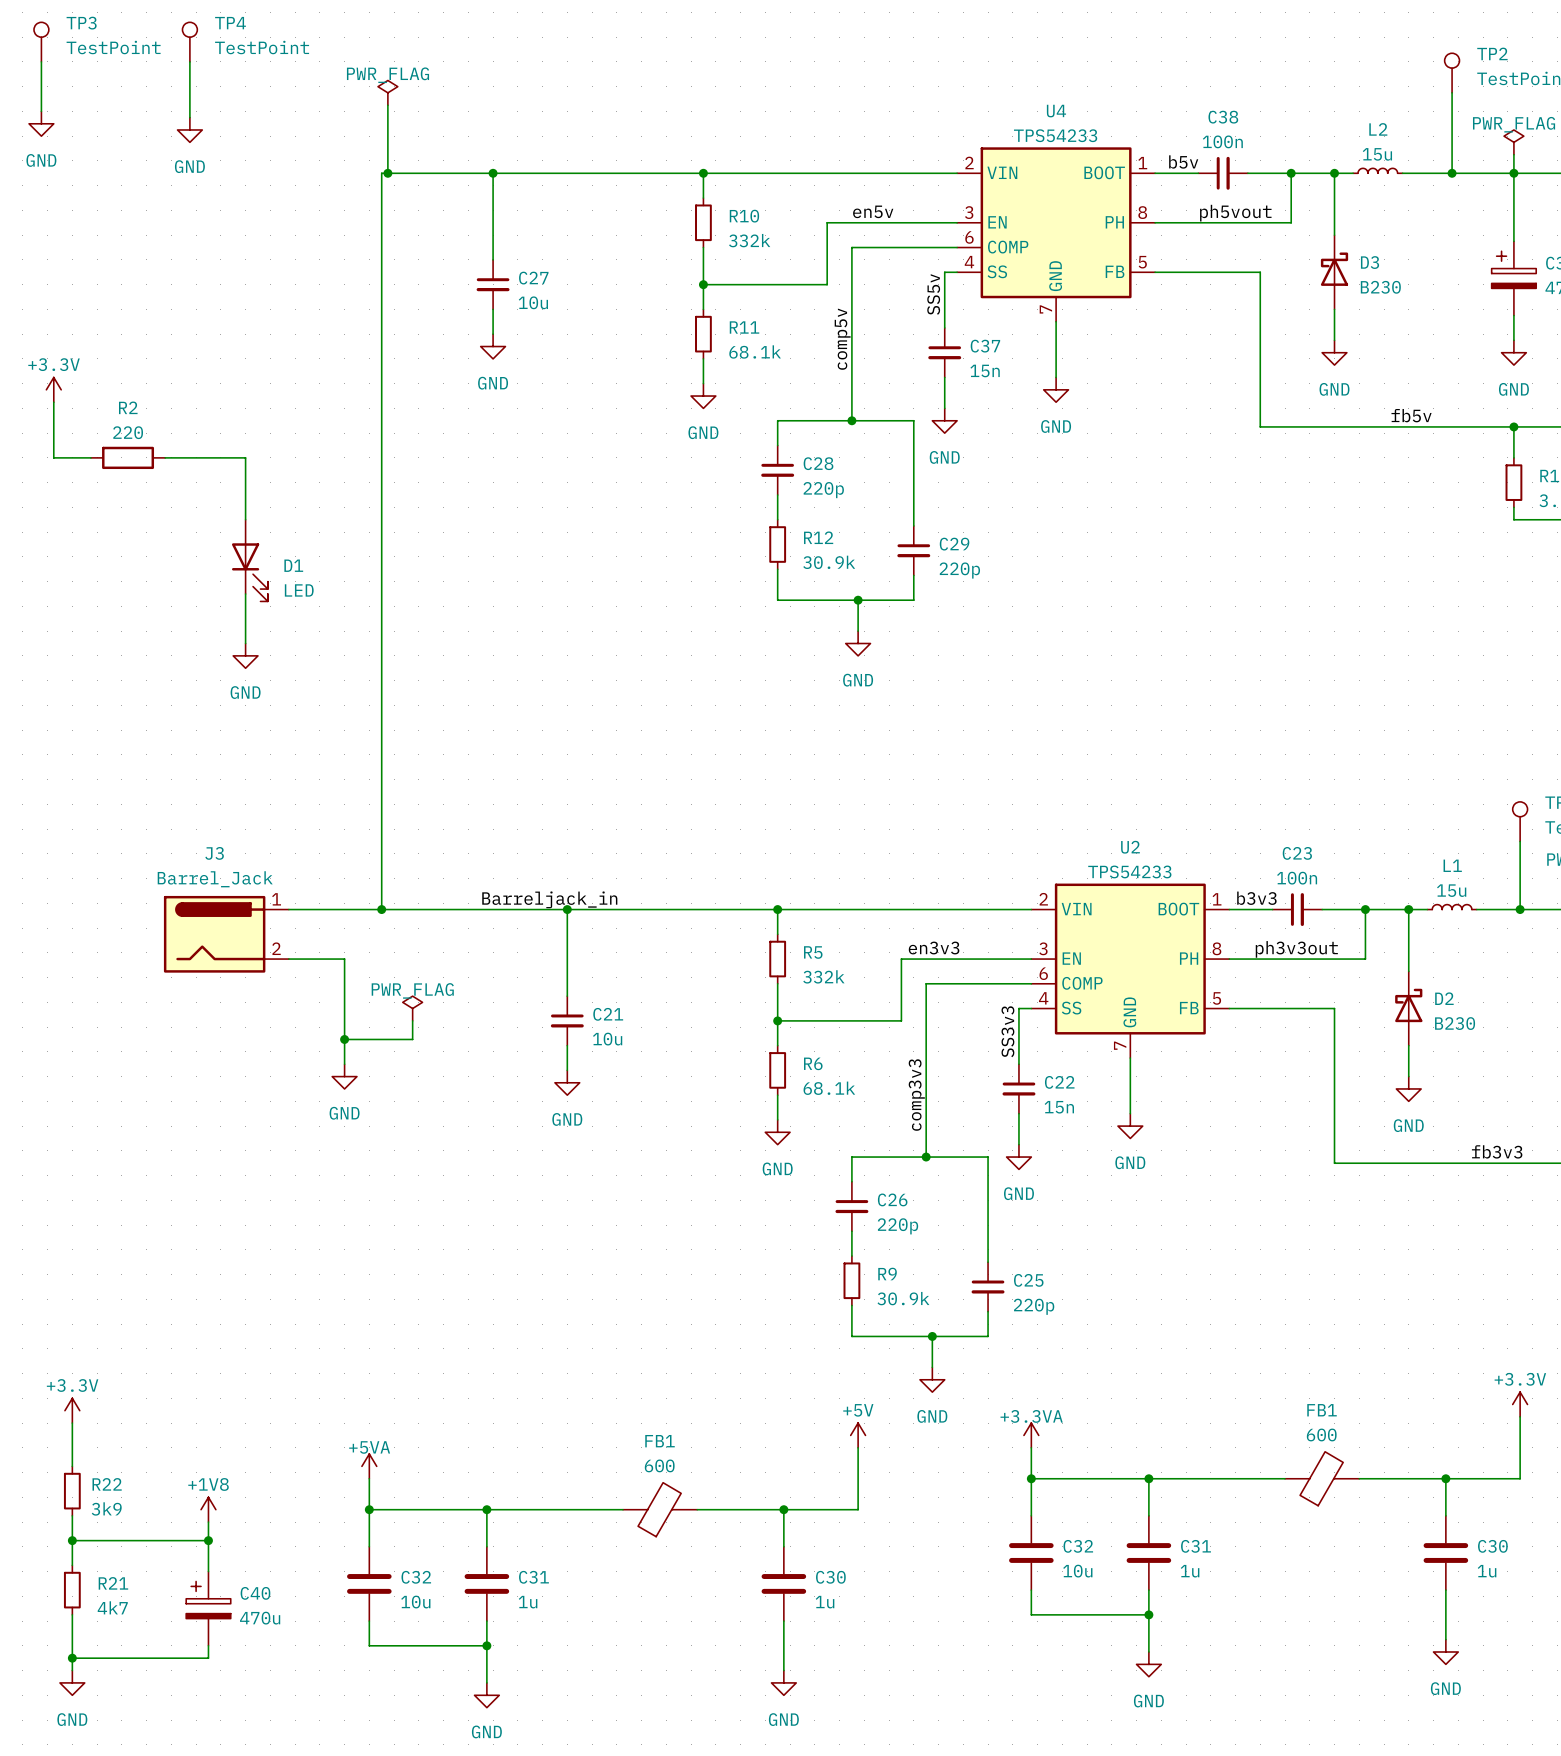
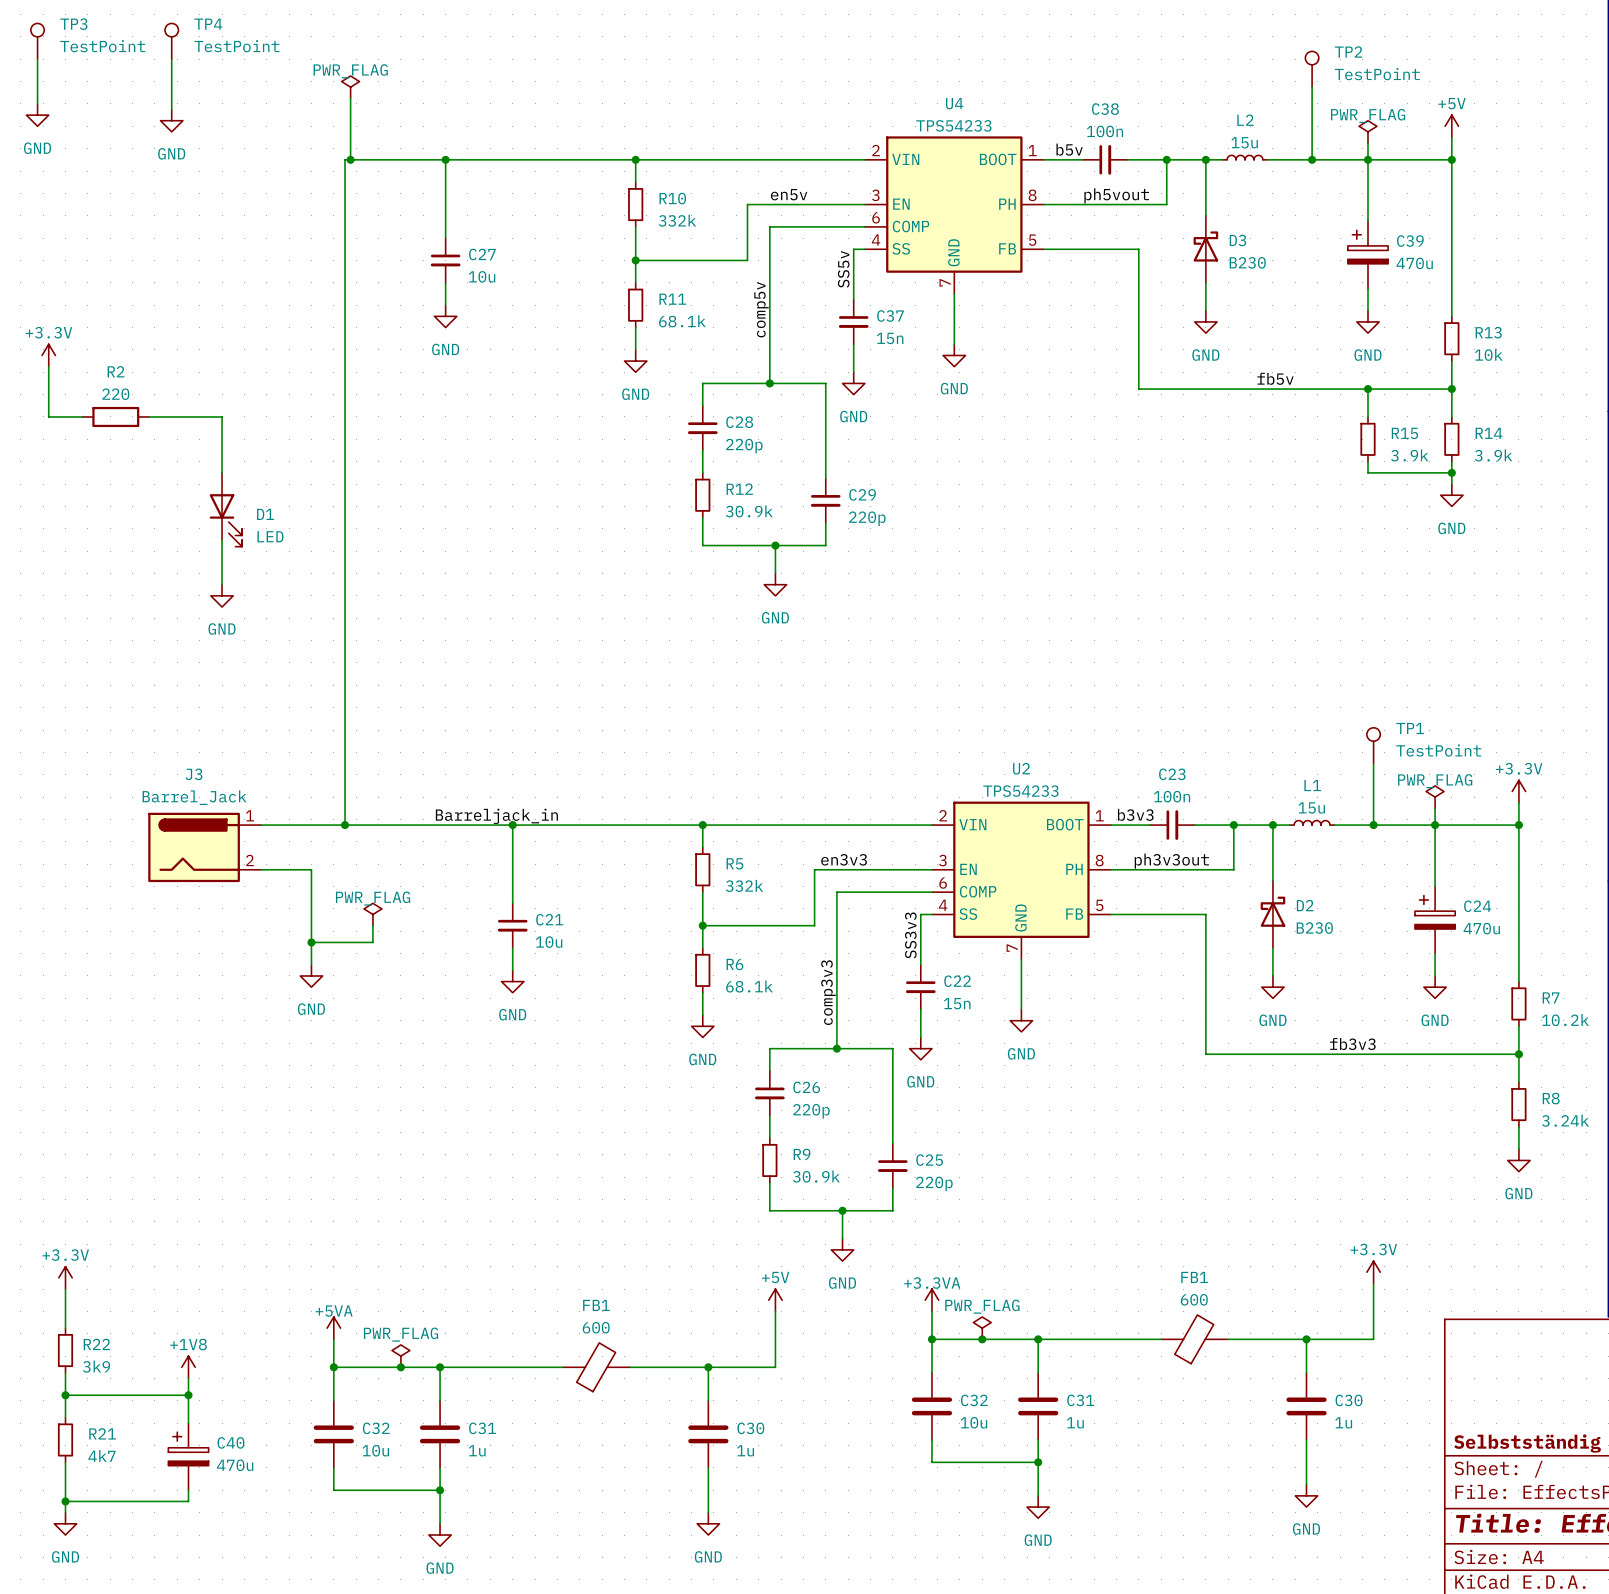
power symbol: none -> PWR_FLAG (982, 1328)
junction: none -> (982, 1339)
power symbol: none -> PWR_FLAG (400, 1356)
junction: none -> (400, 1367)

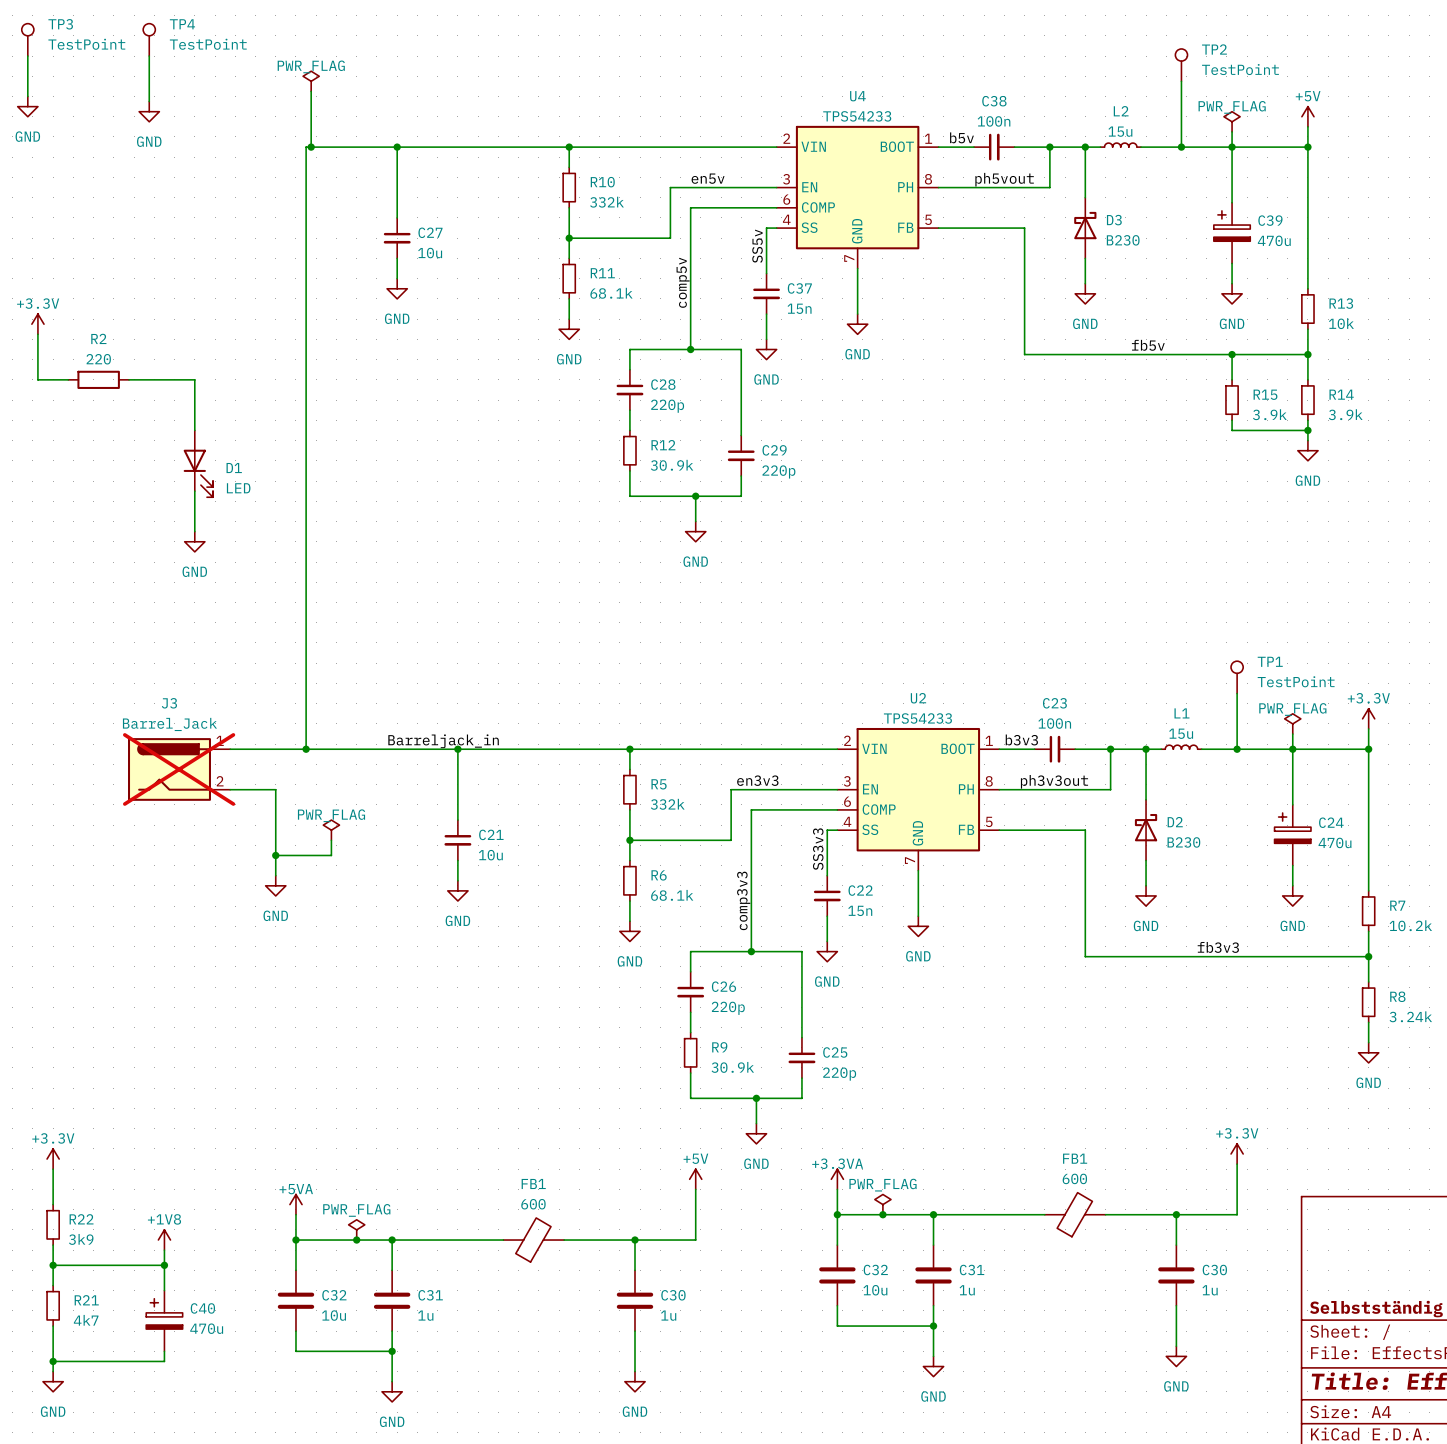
J3 do-not-place cross: none -> (179, 769)

